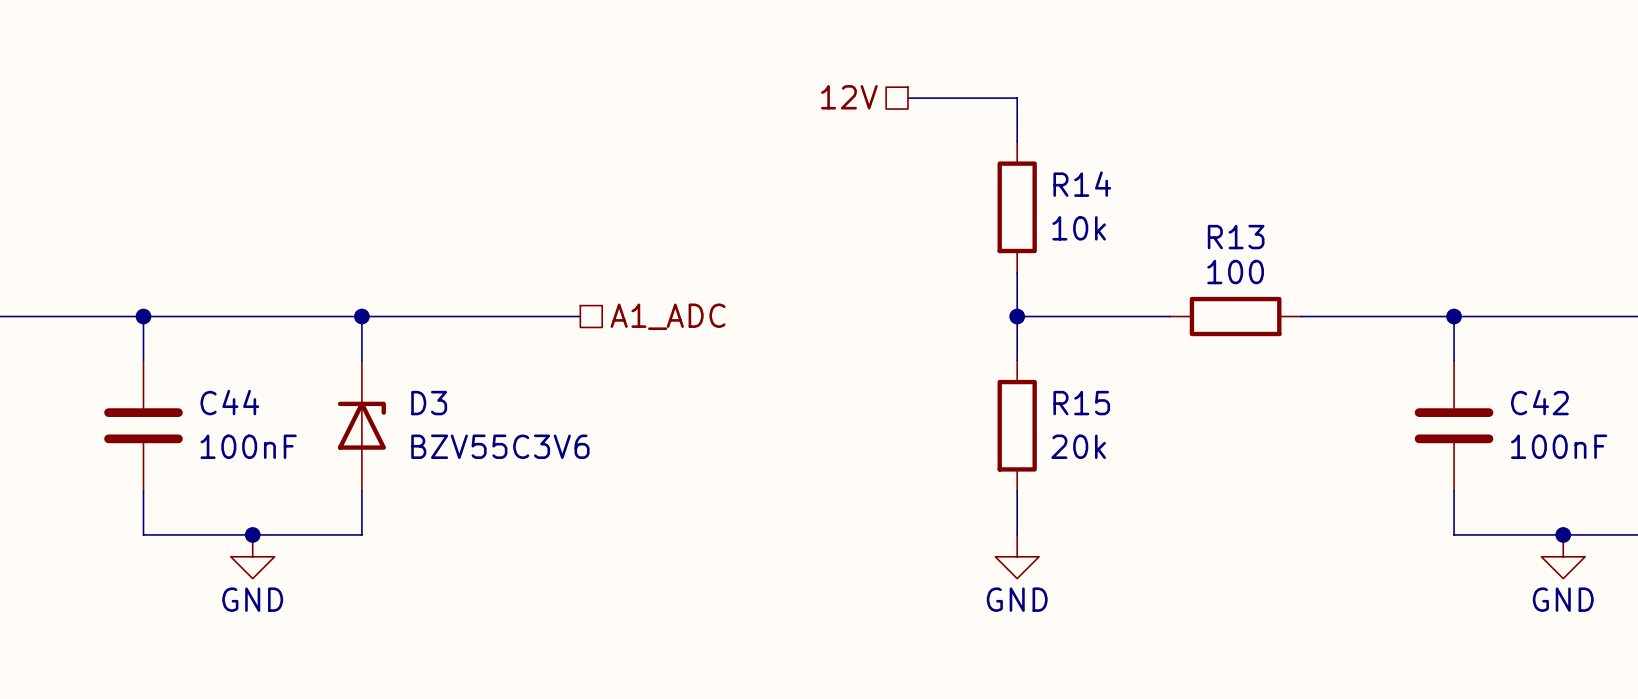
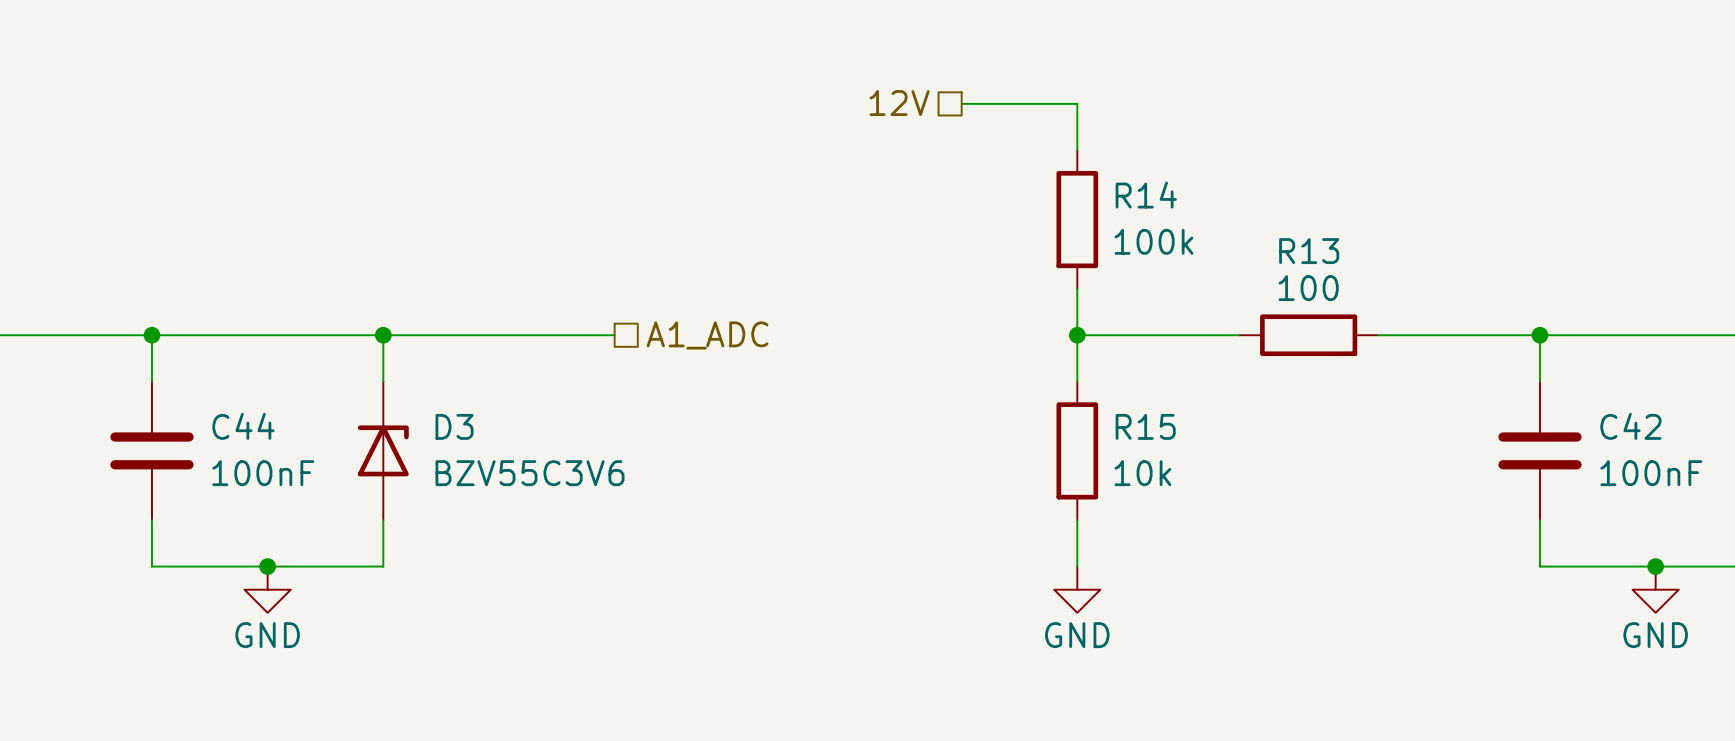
R14 value: 10k (1079, 228) -> 100k (1153, 241)
R15 value: 20k (1078, 446) -> 10k (1142, 473)

